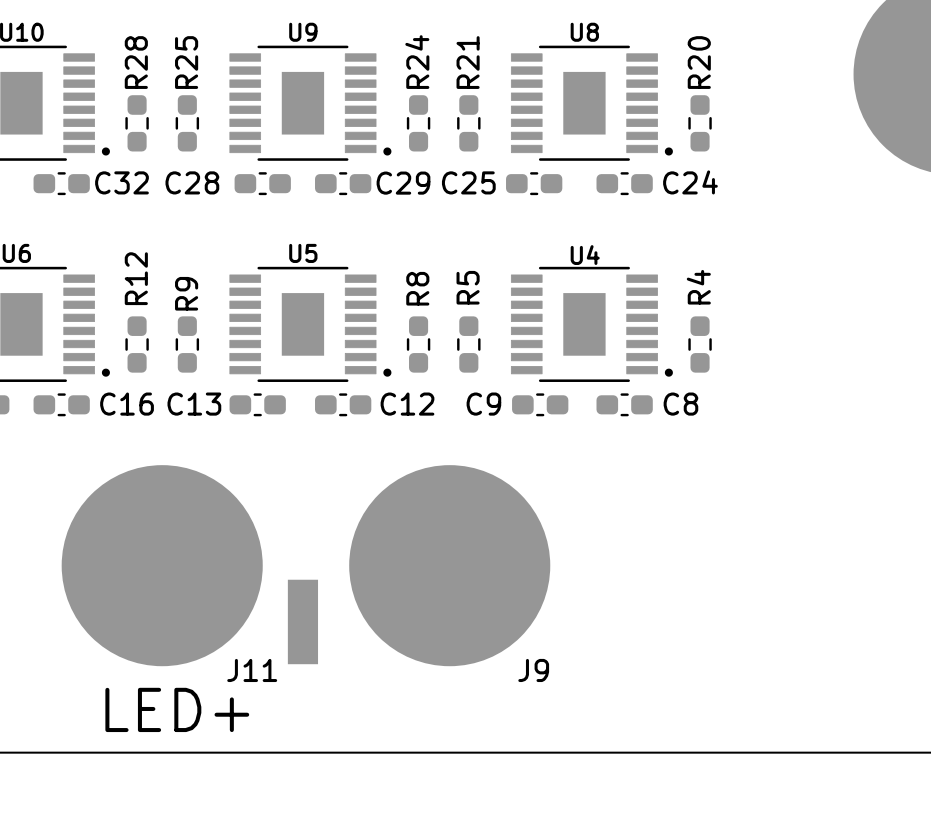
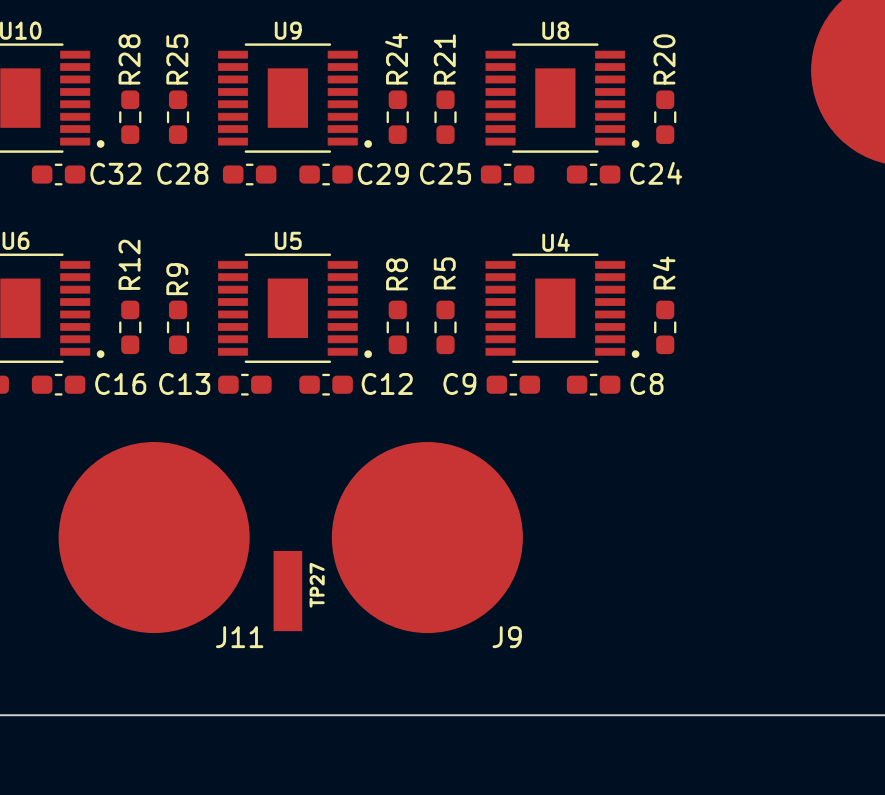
TP27 name: none -> TP27 (317, 585)
text: LED+ (177, 709) -> none

